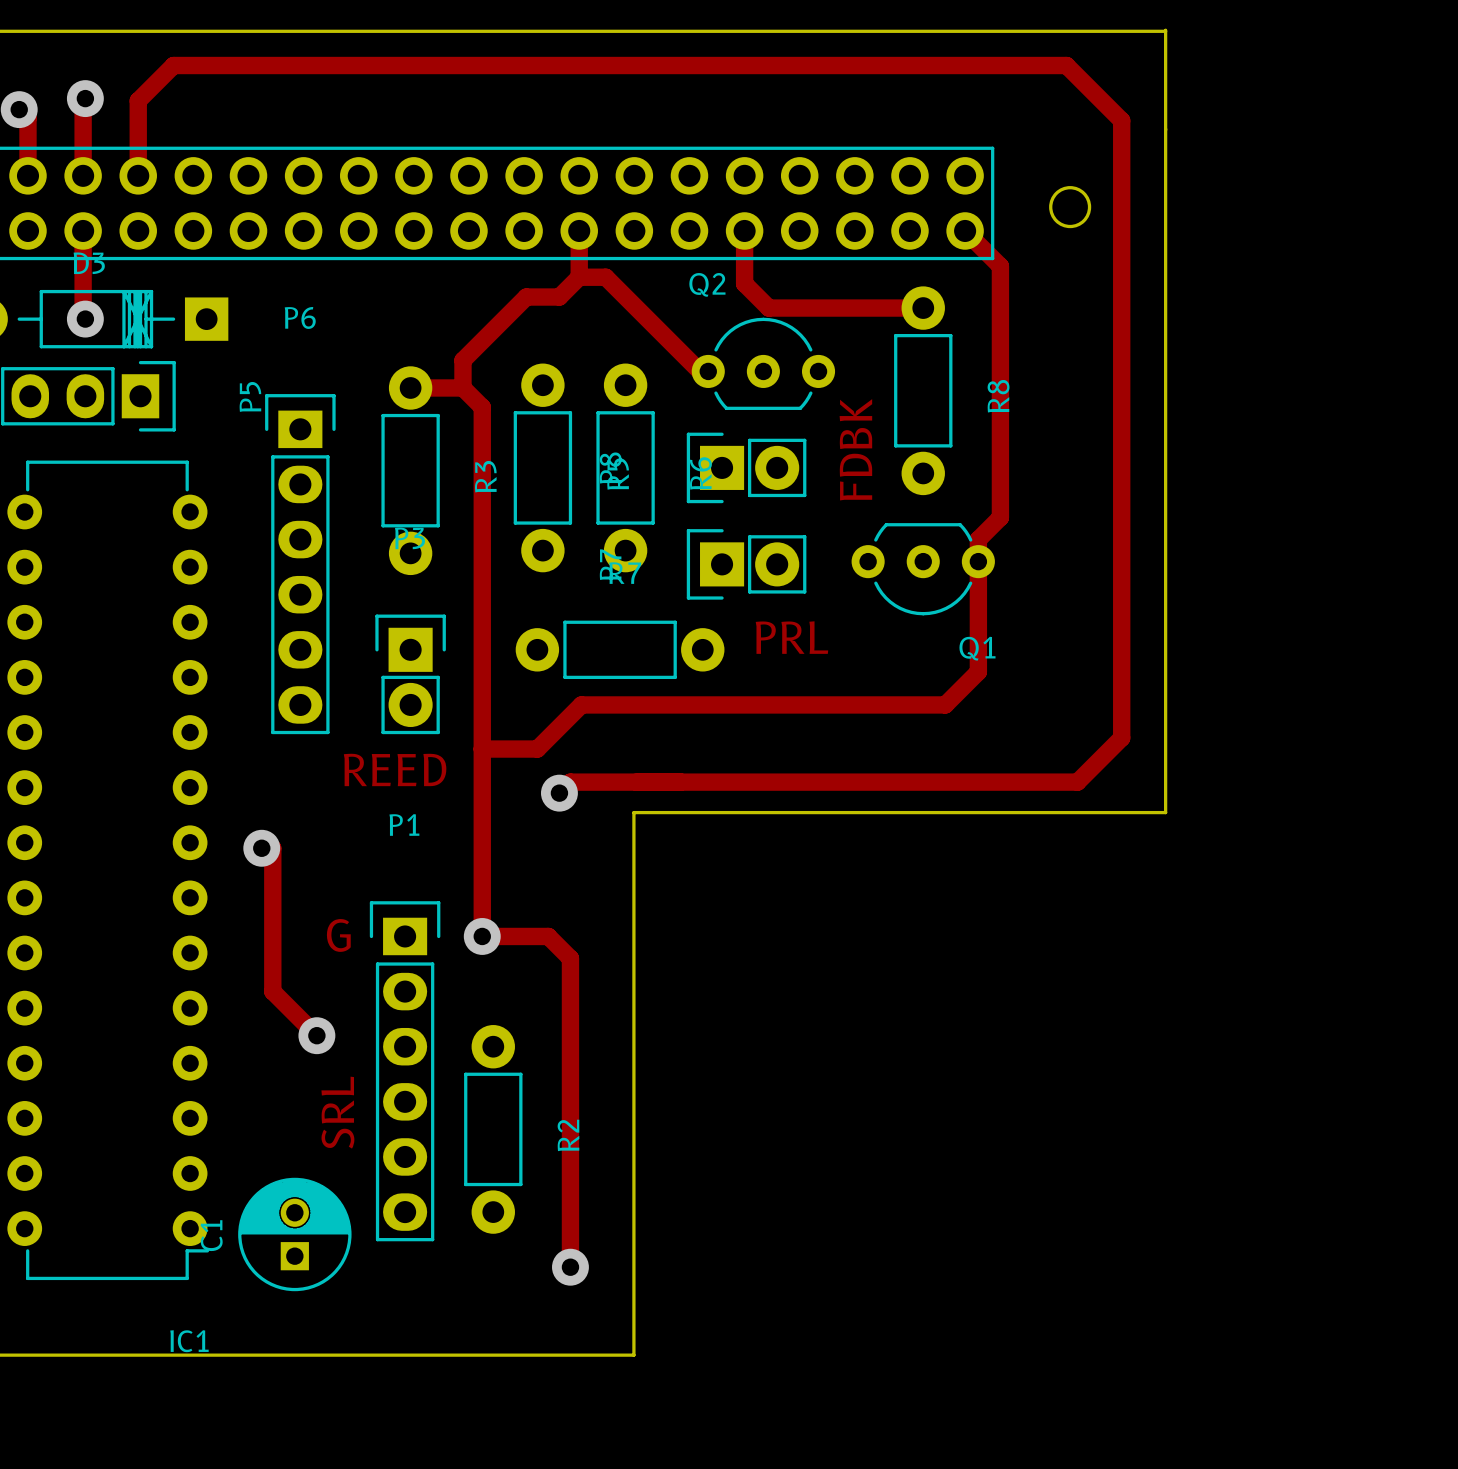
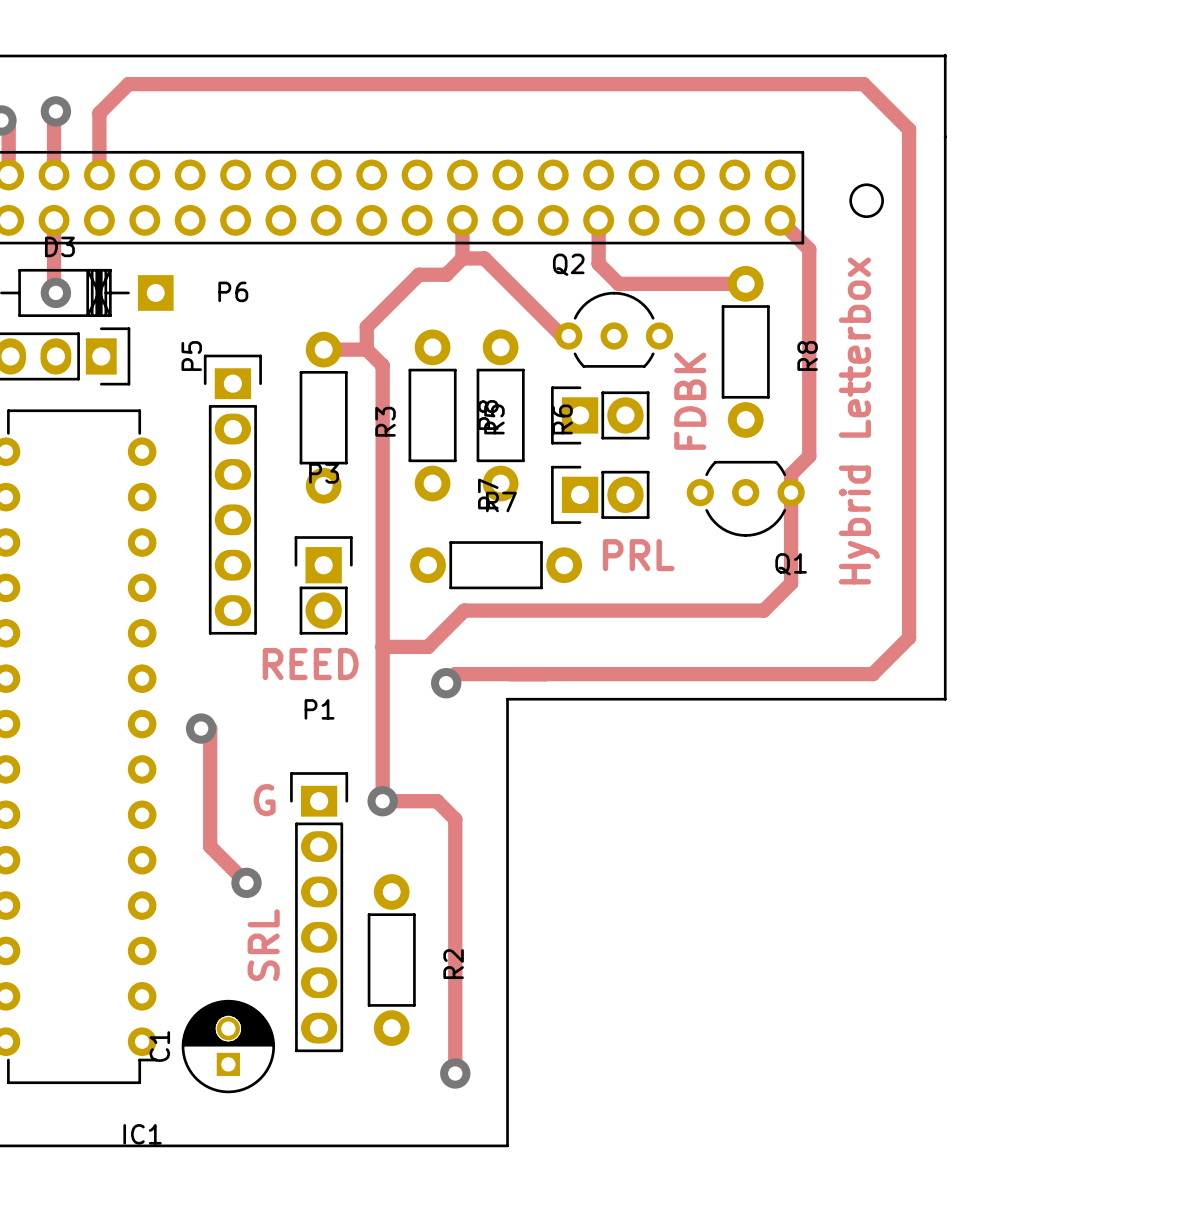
text: none -> Hybrid Letterbox (859, 420)

